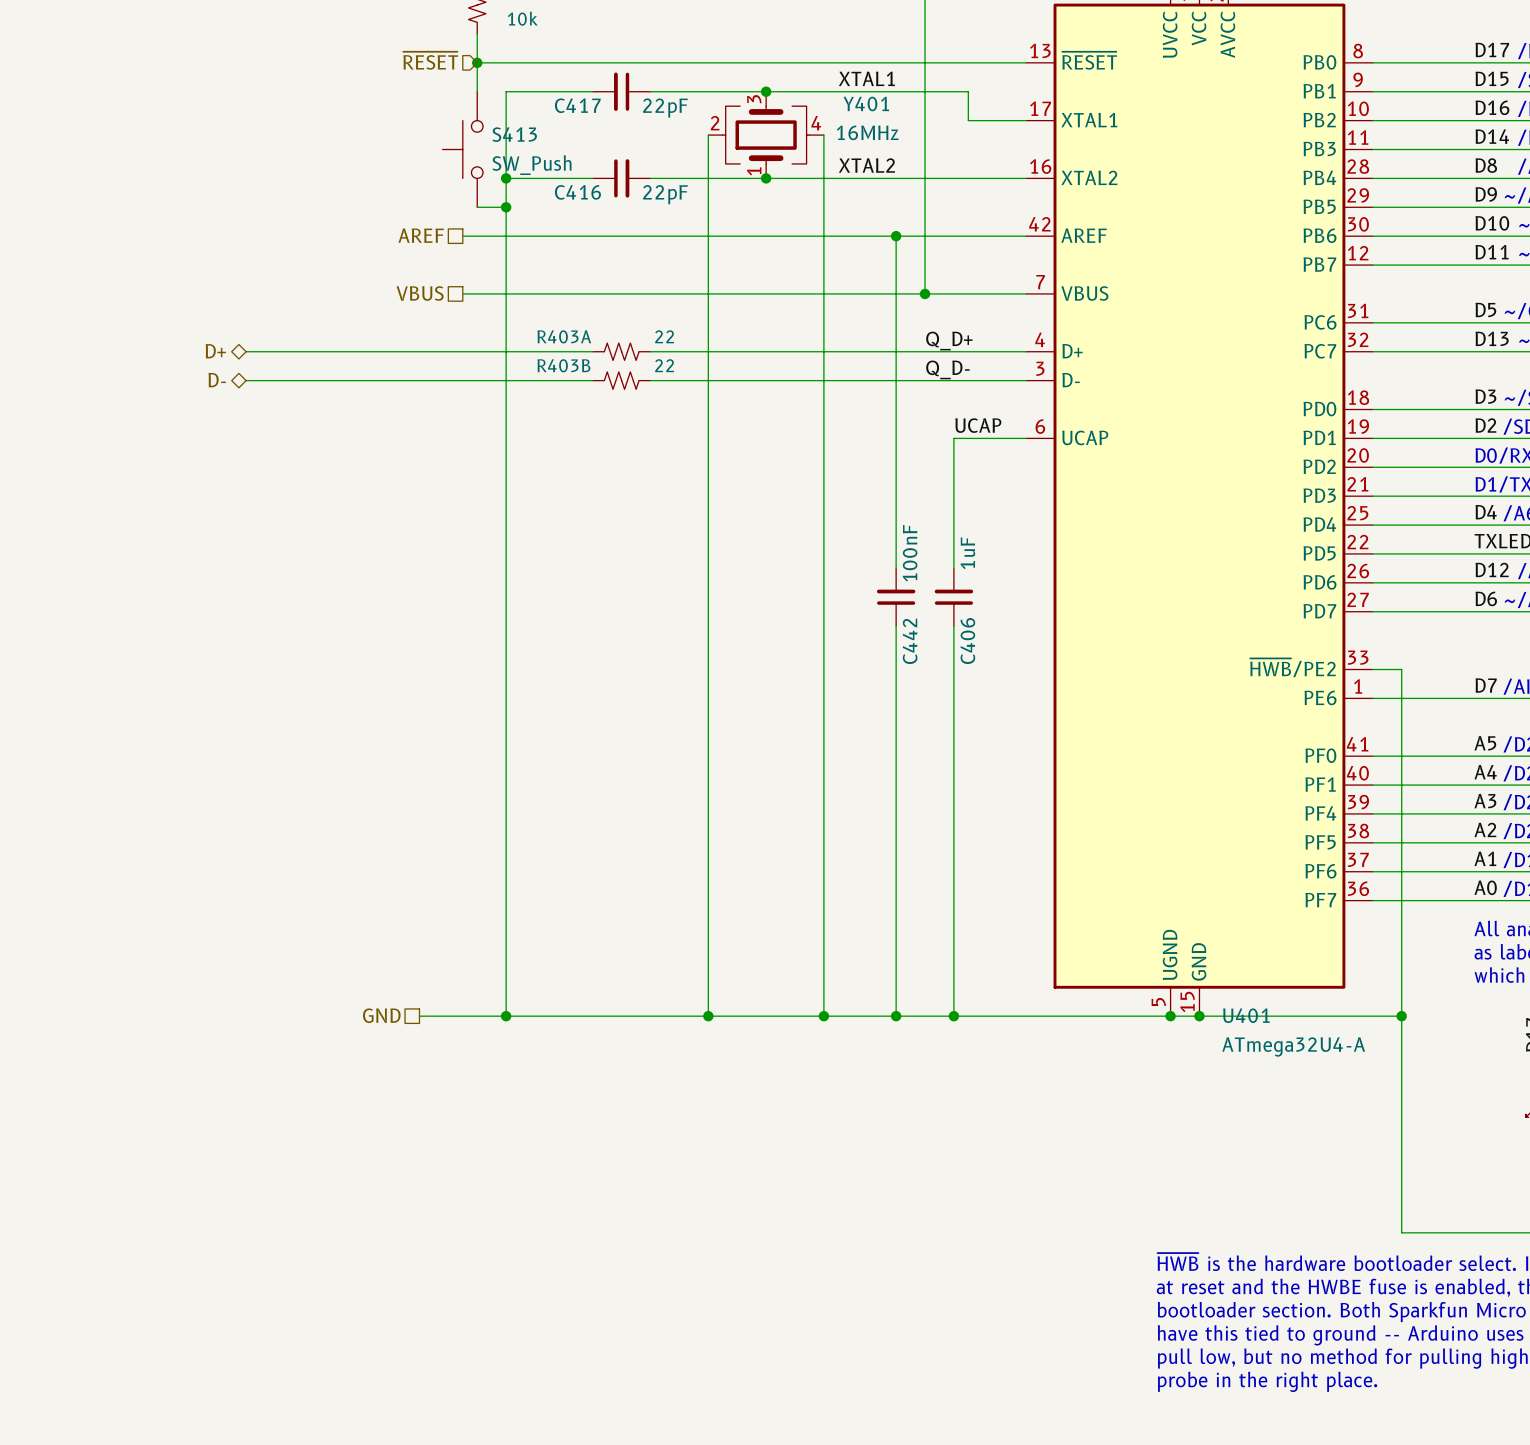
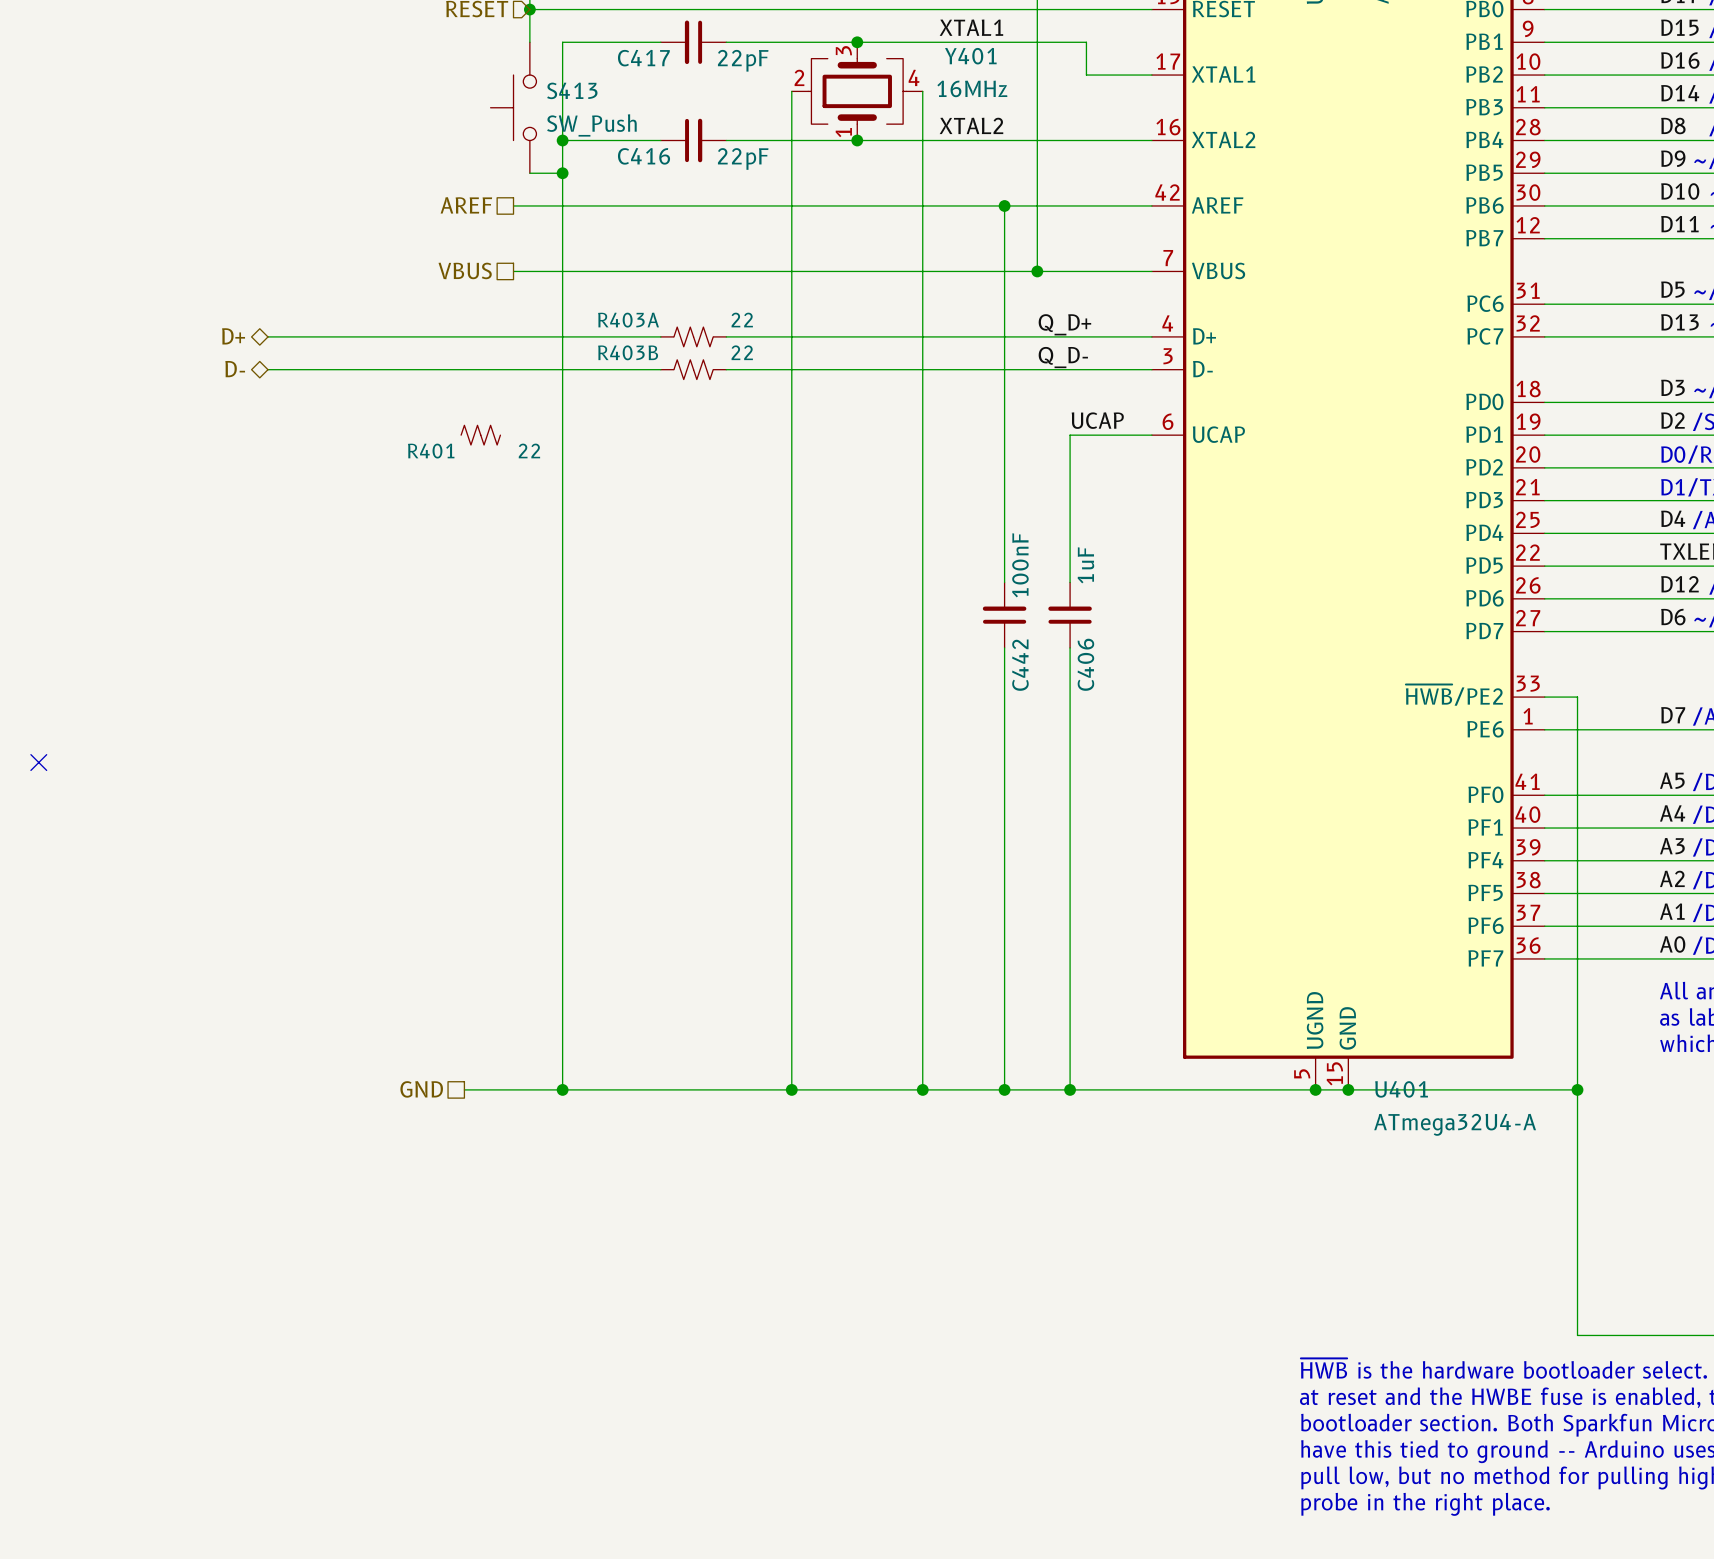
R401: none -> 22 (480, 435)
no-connect mark: none -> (38, 762)

